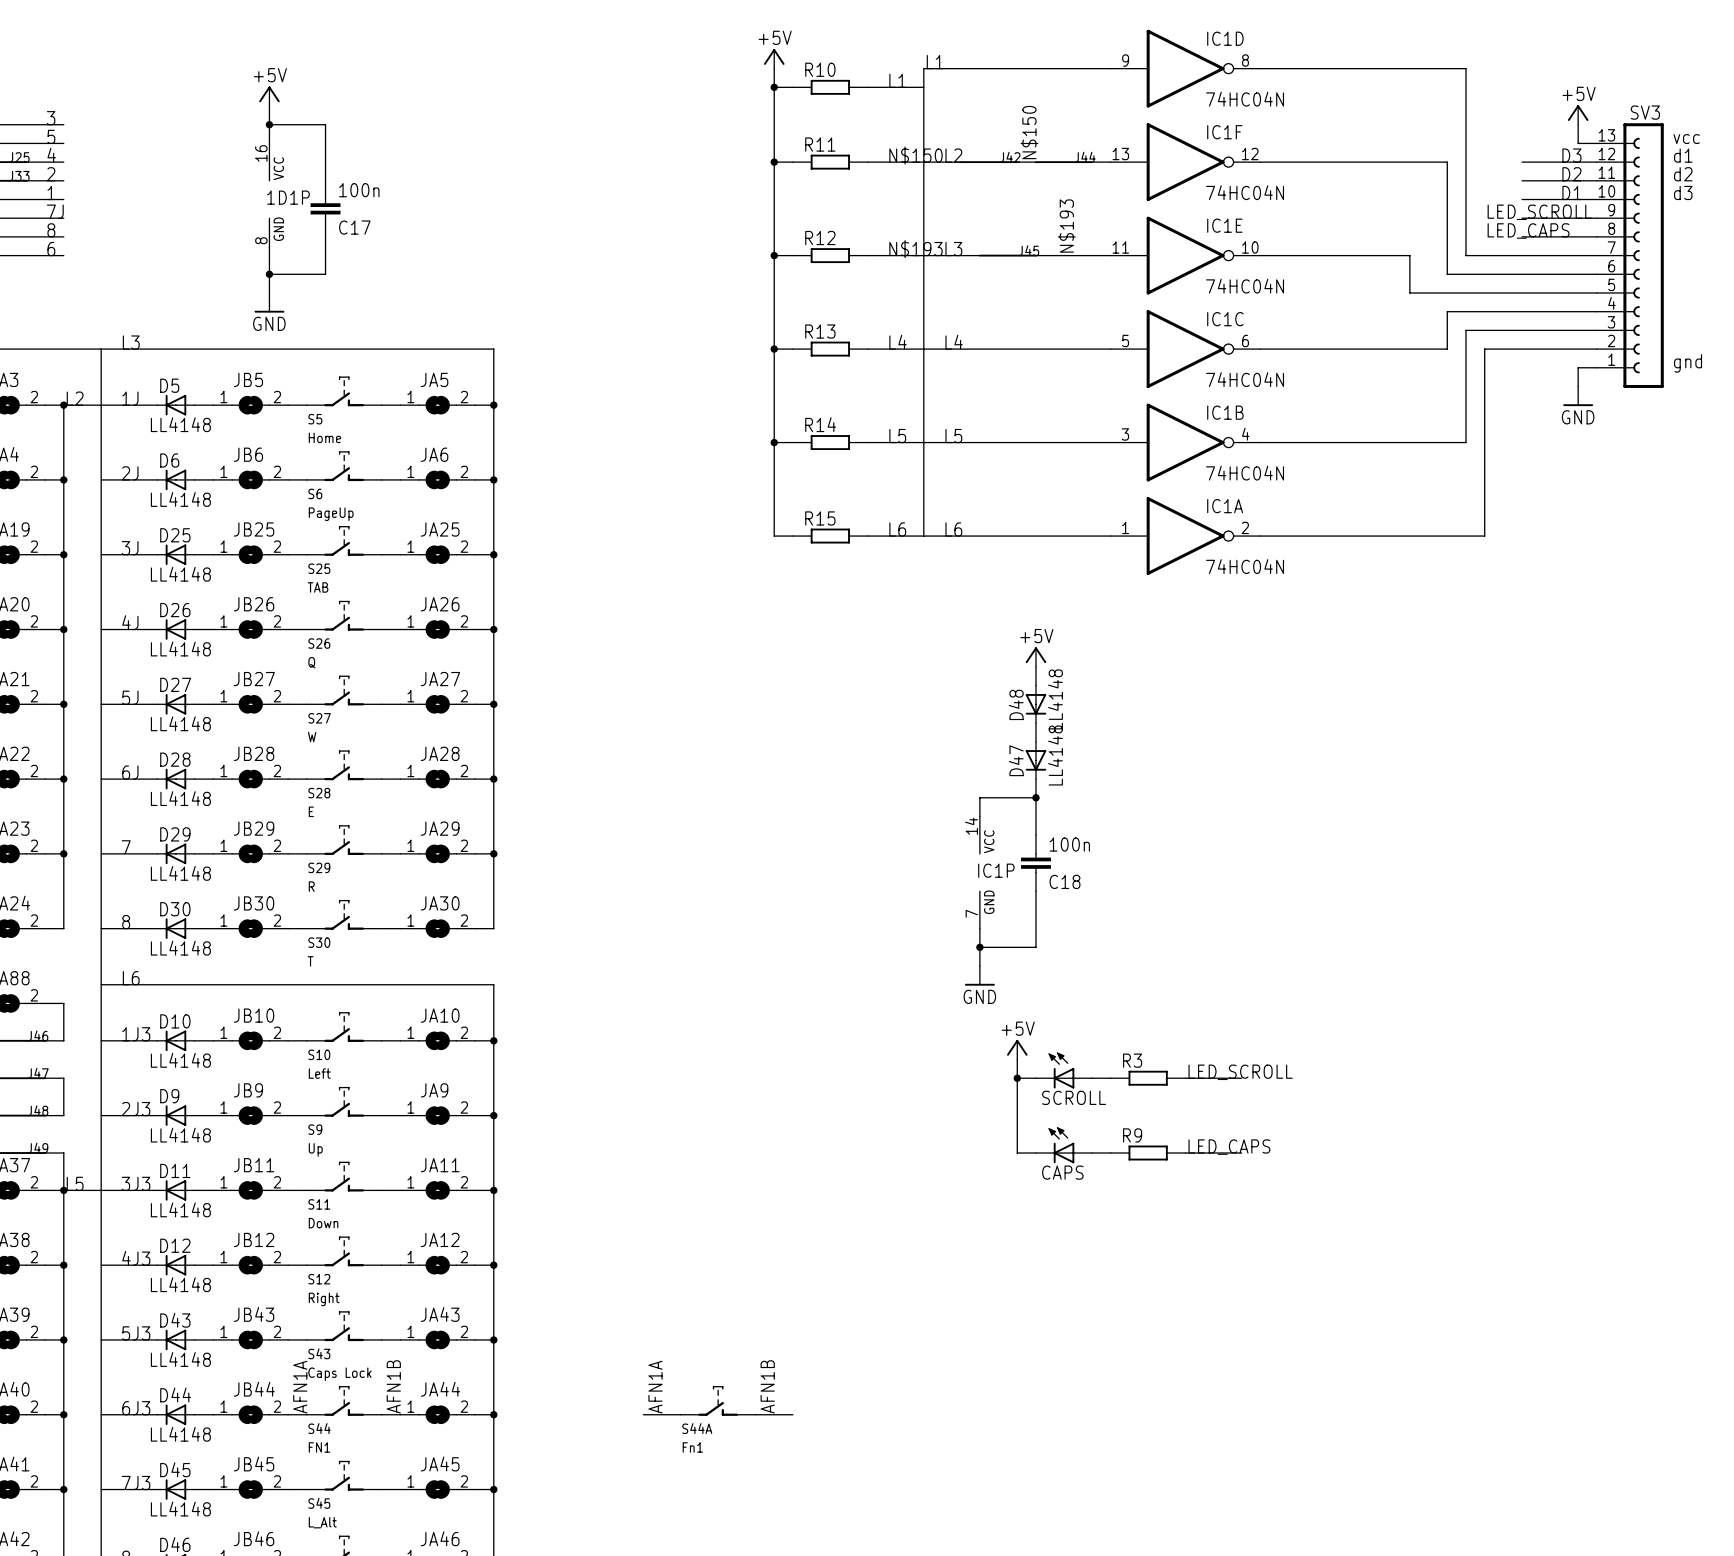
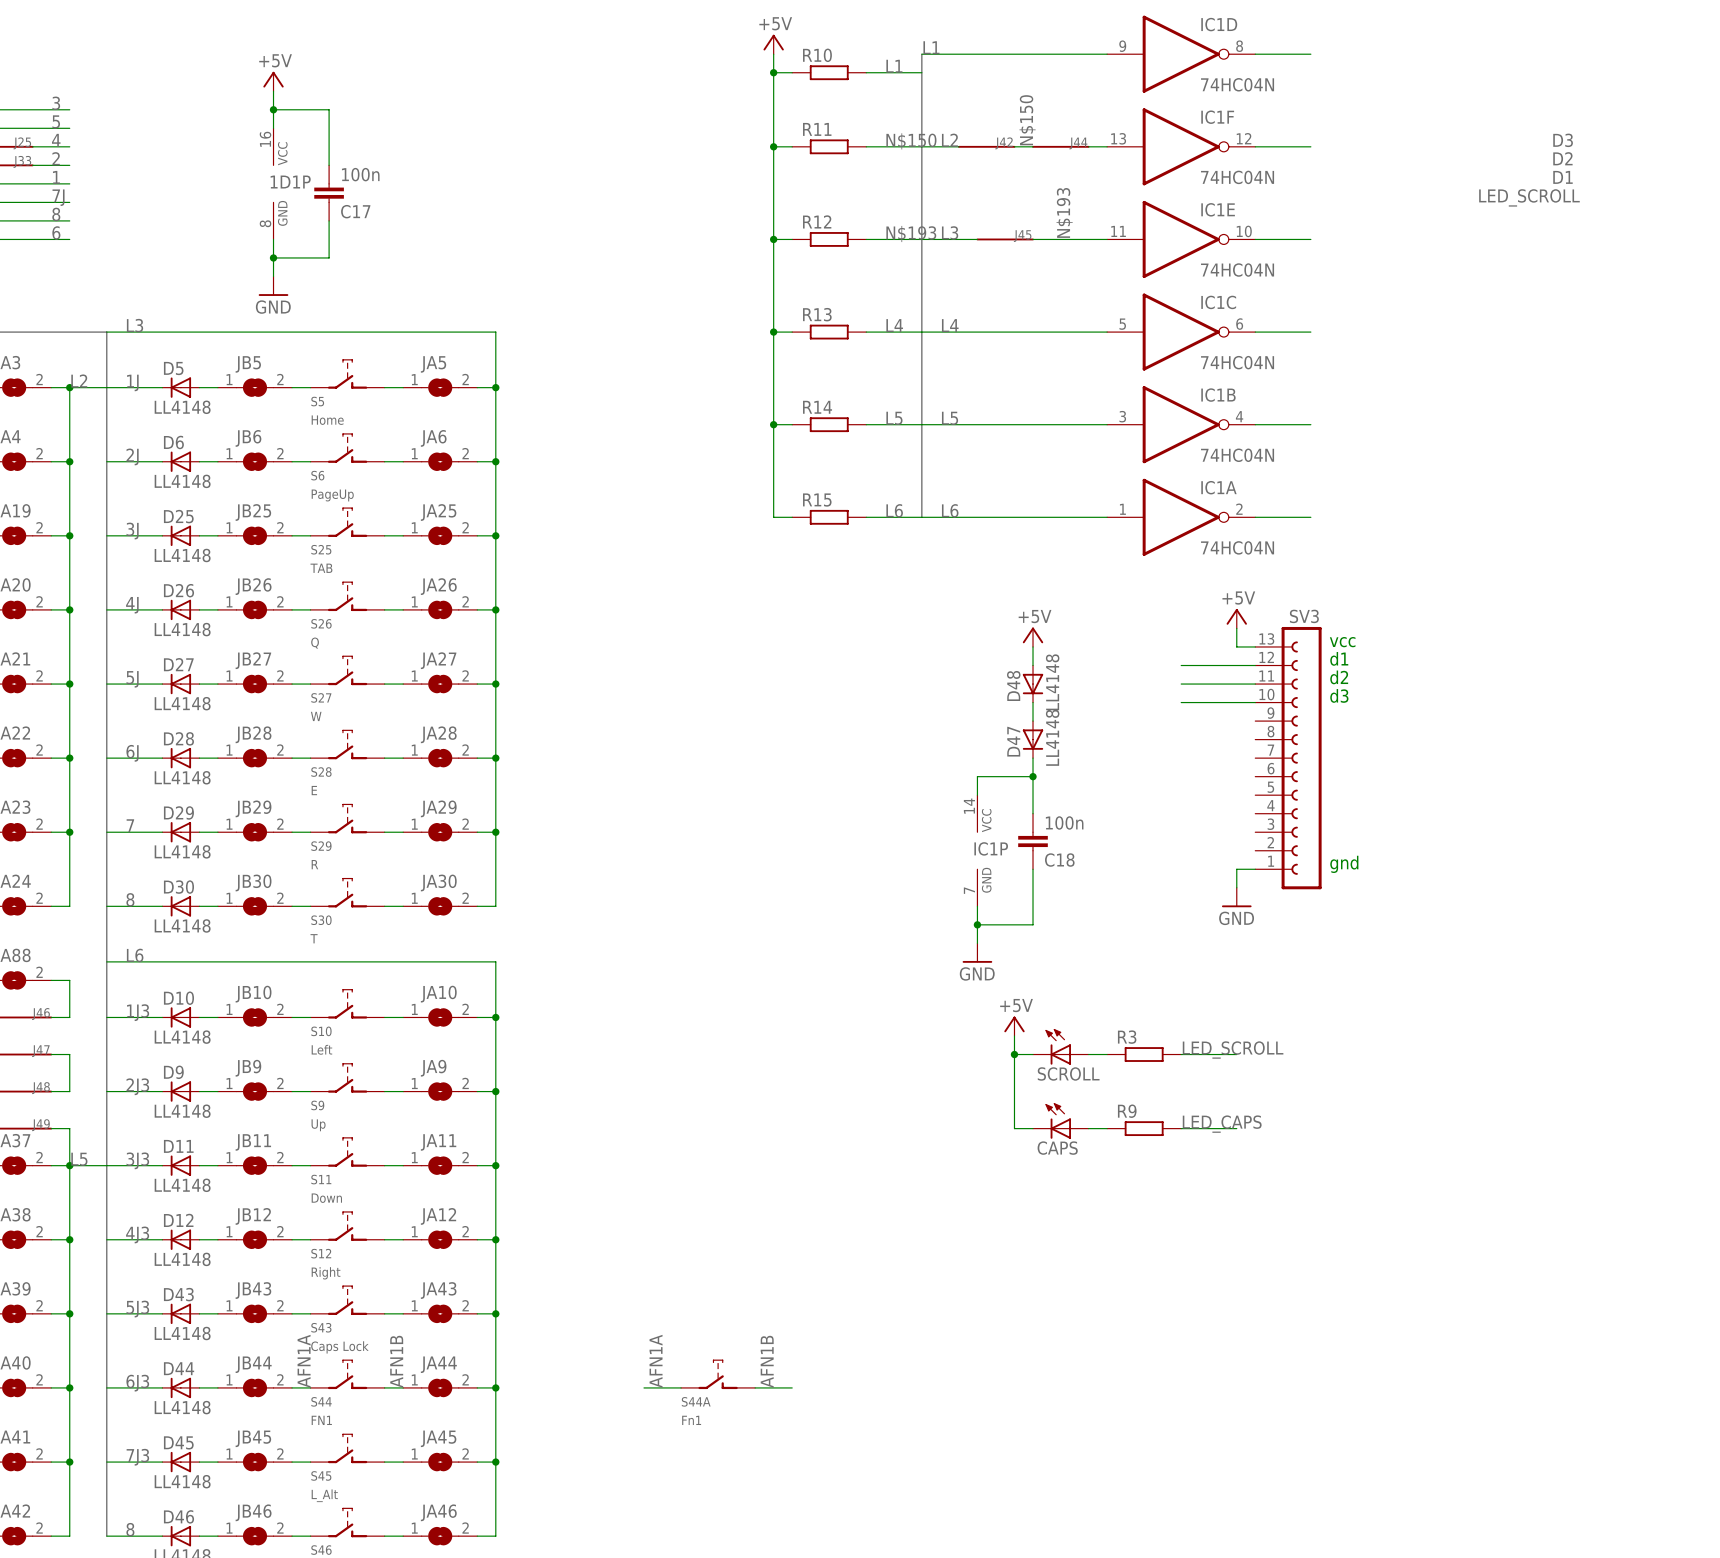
wire: (1316, 68) (1465, 68) (1465, 255) (1596, 255) -> none
power symbol: +5V (1578, 114) -> none
wire: (1578, 124) (1578, 143) (1596, 143) -> none
text: vcc (1686, 139) -> none
text: d1 (1683, 155) -> none
wire: (1316, 162) (1447, 162) (1447, 274) (1596, 274) -> none
wire: (1522, 162) (1596, 162) -> none
text: d2 (1683, 174) -> none
wire: (1522, 180) (1596, 180) -> none
text: d3 (1683, 192) -> none
wire: (1522, 199) (1596, 199) -> none
wire: (1522, 218) (1596, 218) -> none
label: LED_CAPS (1528, 230) -> none
wire: (1522, 236) (1596, 236) -> none
wire: (1316, 255) (1409, 255) (1409, 292) (1596, 292) -> none
SV3 position: (1630, 255) -> (1288, 758)
wire: (1596, 311) (1447, 311) (1447, 349) (1316, 349) -> none
wire: (1596, 330) (1465, 330) (1465, 442) (1316, 442) -> none
wire: (1596, 349) (1484, 349) (1484, 536) (1316, 536) -> none
text: gnd (1688, 363) -> none
wire: (1596, 367) (1578, 367) (1578, 386) -> none
power symbol: GND (1578, 396) -> none
power symbol: none -> +5V (1236, 618)
wire: none -> (1236, 628) (1236, 646) (1255, 646)
text: none -> vcc (1342, 642)
text: none -> d1 (1339, 658)
wire: none -> (1181, 665) (1255, 665)
text: none -> d2 (1339, 677)
wire: none -> (1181, 684) (1255, 684)
text: none -> d3 (1339, 695)
wire: none -> (1181, 702) (1255, 702)
text: none -> gnd (1344, 864)
wire: none -> (1255, 869) (1236, 869) (1236, 887)
power symbol: none -> GND (1236, 897)

